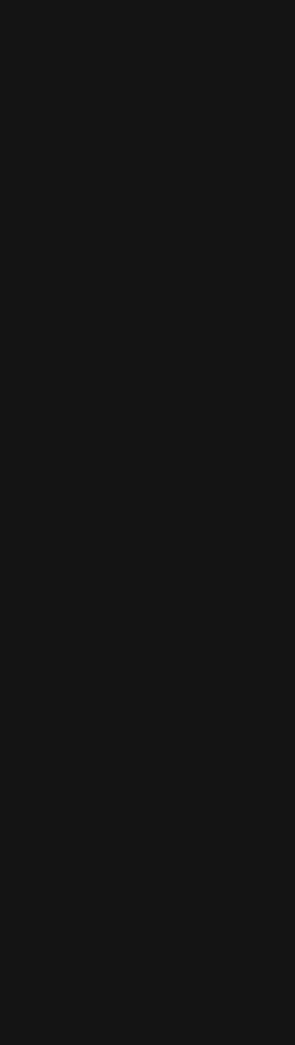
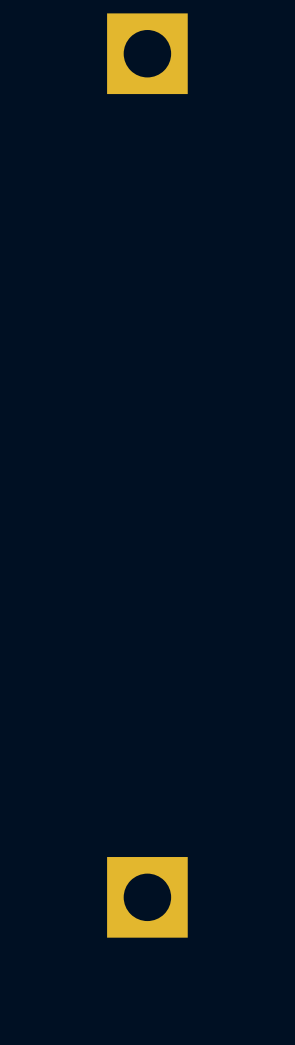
part: none -> (147, 53)
part: none -> (147, 897)

